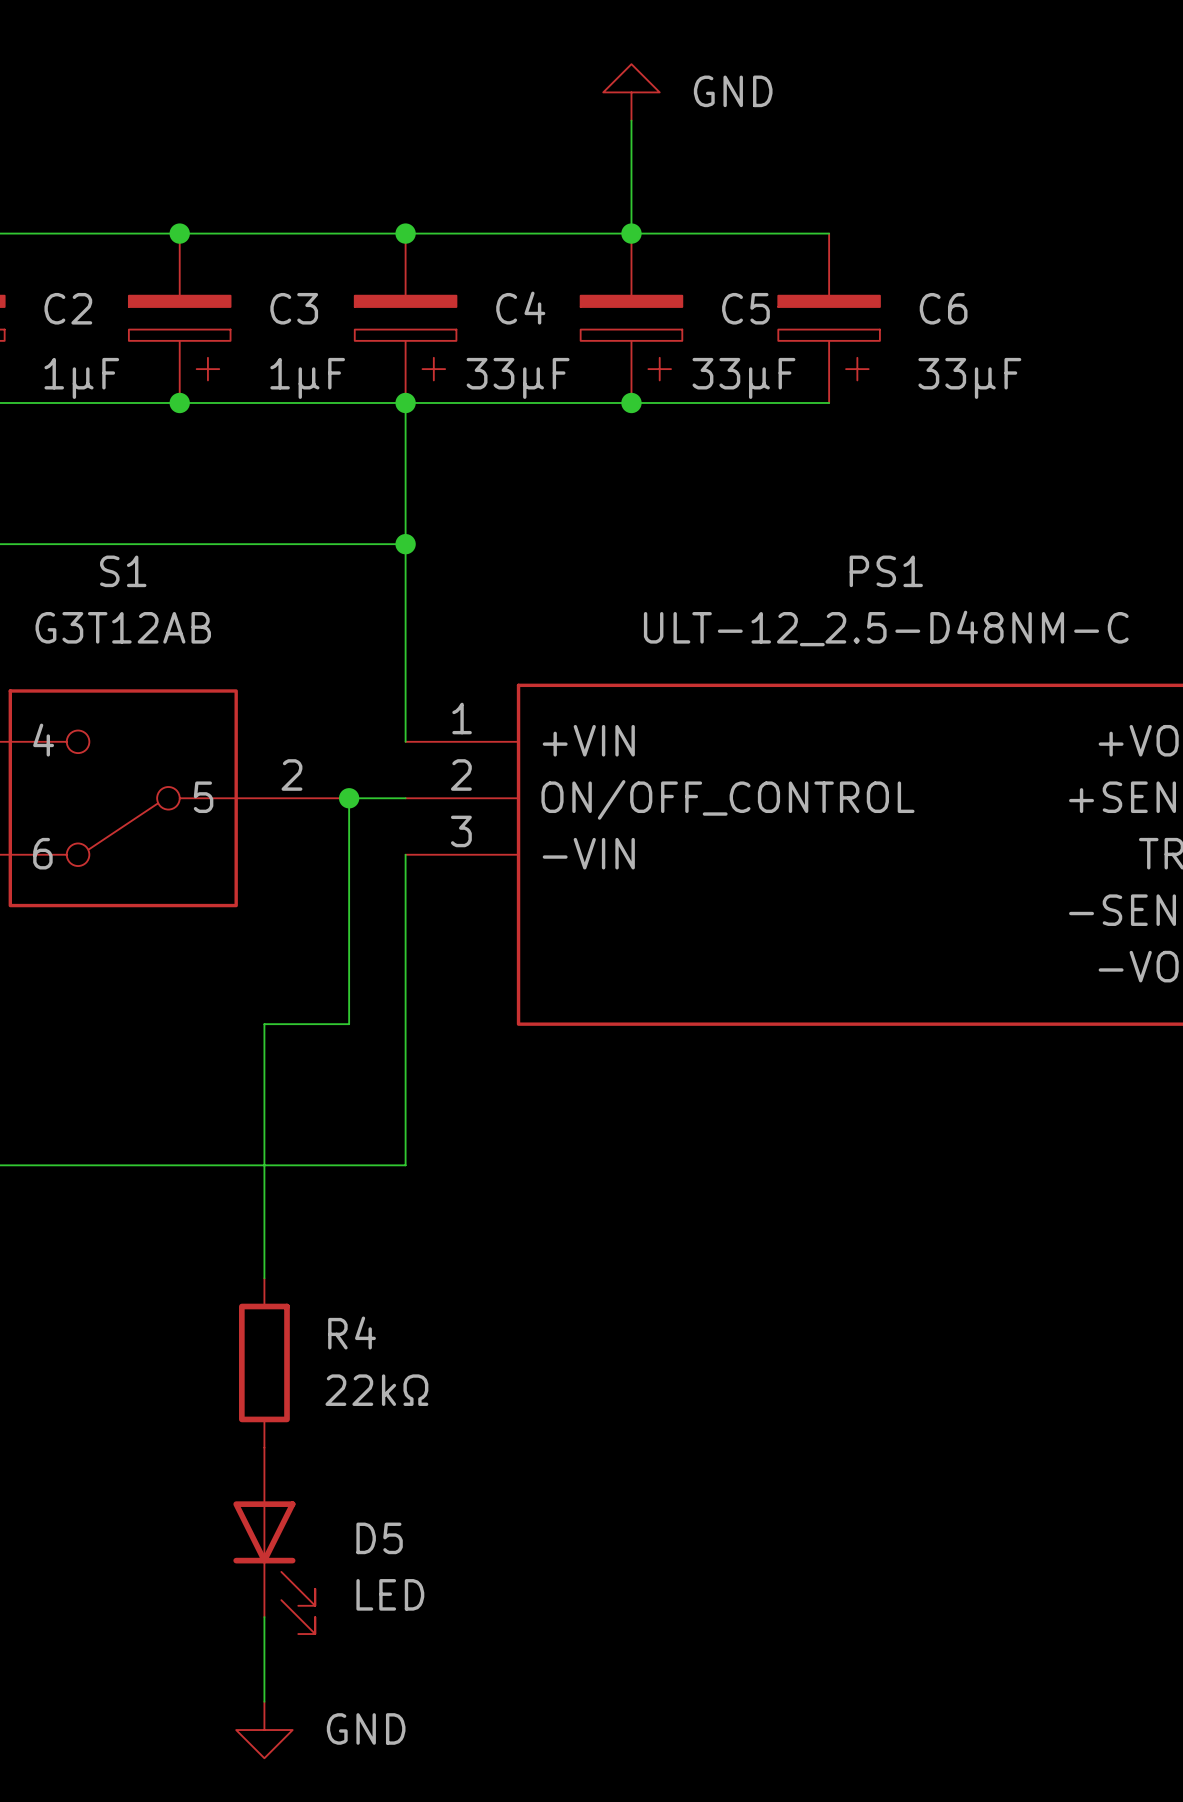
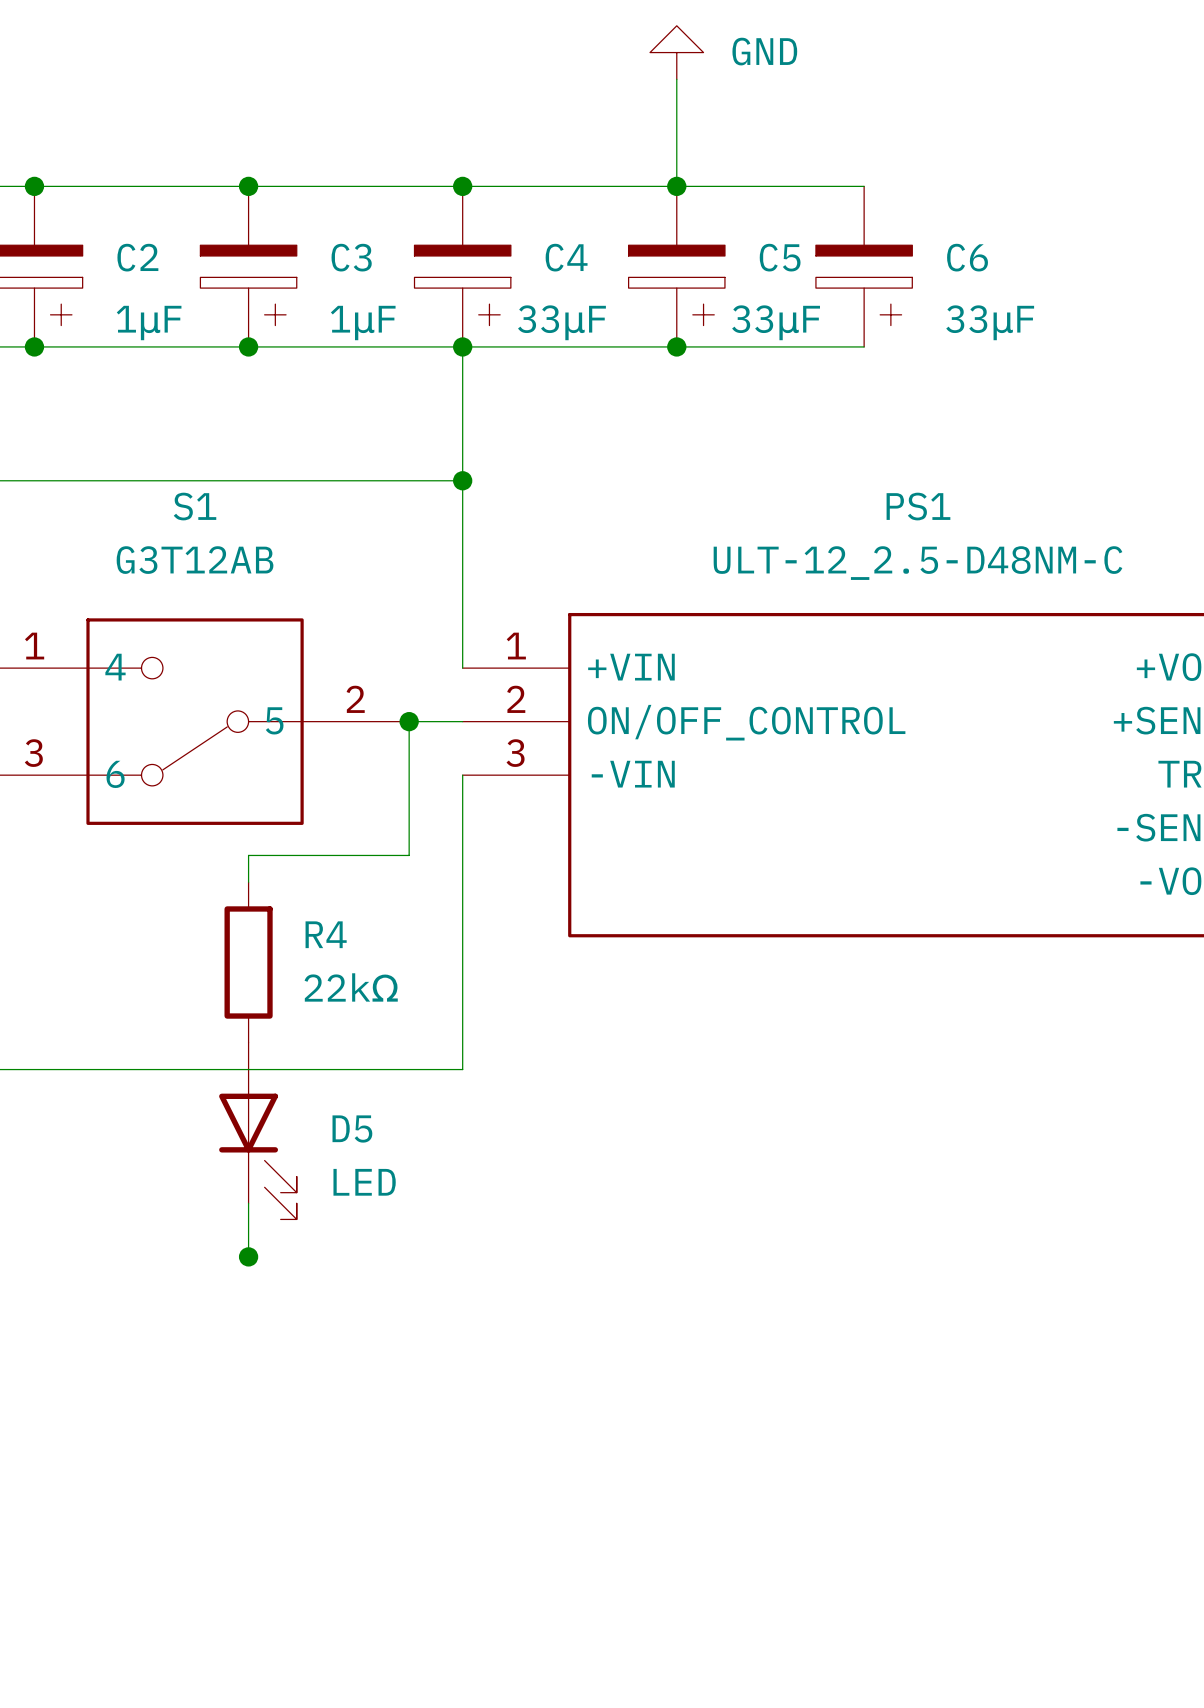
wire: (349, 939) (349, 1024) (264, 1024) (264, 1278) -> (409, 855) (248, 855) (248, 882)
wire: none -> (248, 1203) (248, 1256)
junction: none -> (248, 1256)
R4 position: (264, 1362) -> (248, 962)
D5 position: (274, 1540) -> (257, 1131)
wire: (264, 1617) (264, 1701) -> none
power symbol: GND (264, 1730) -> none

